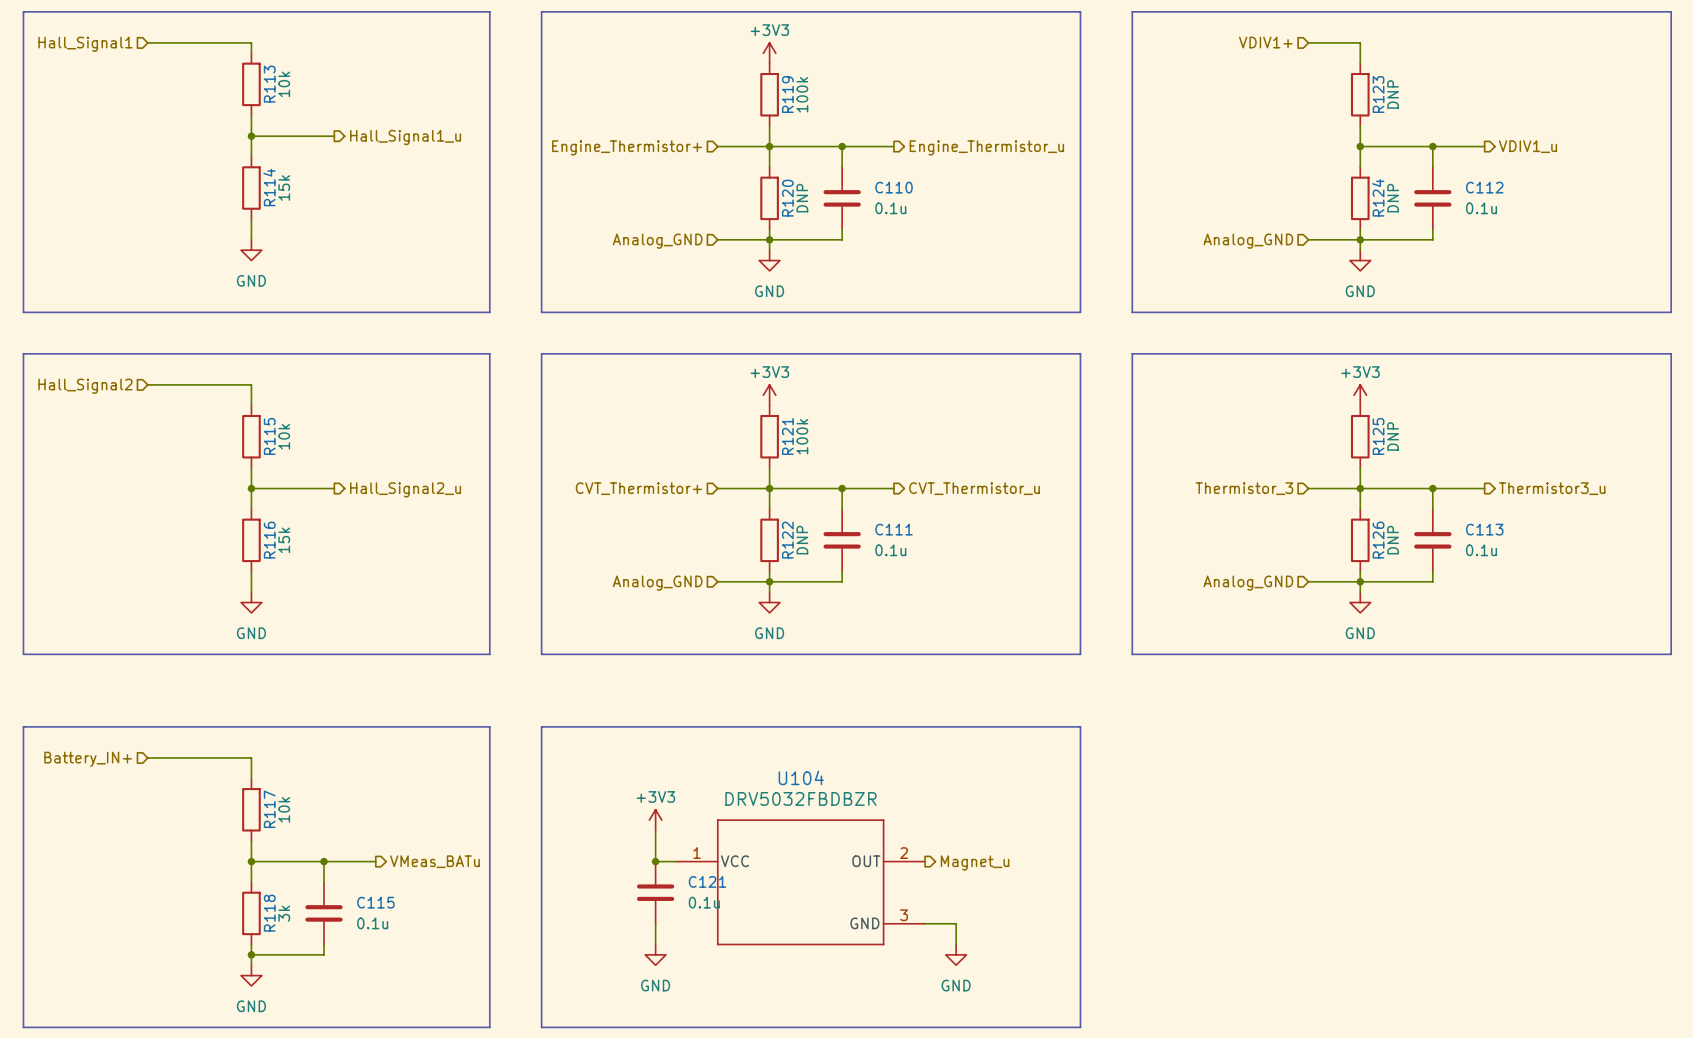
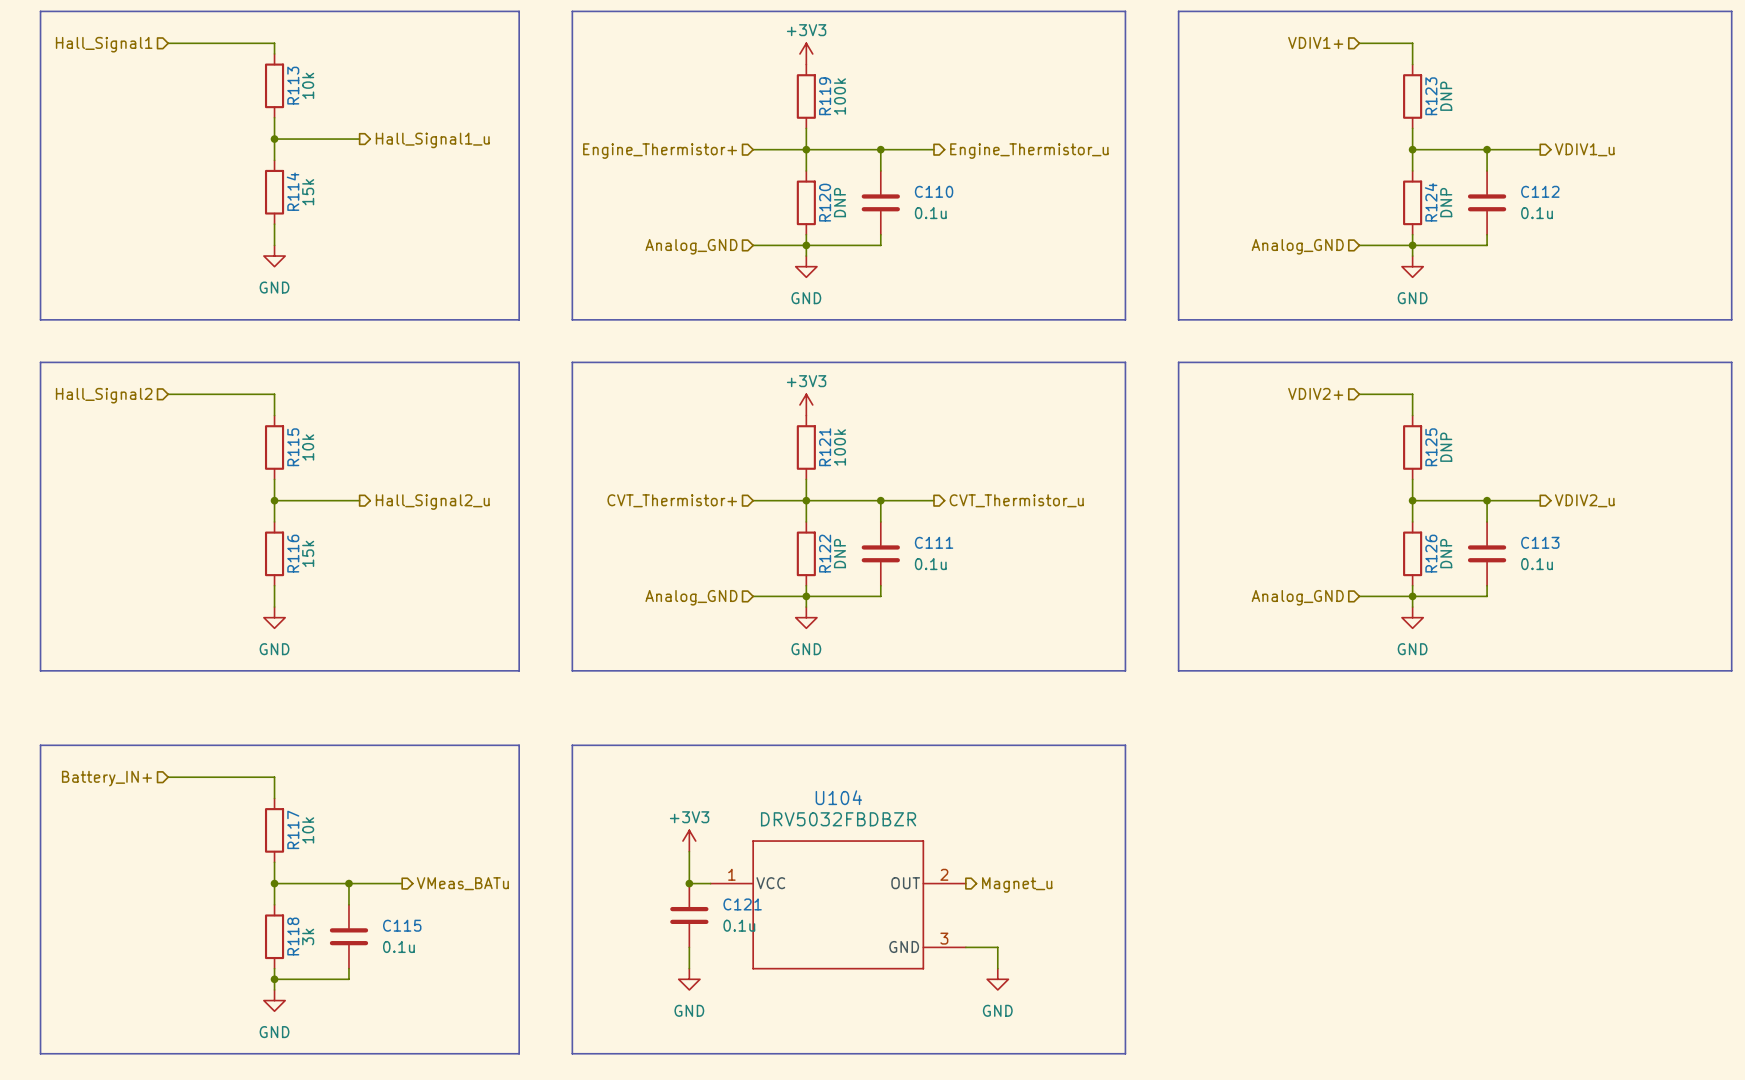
hierarchical label: none -> VDIV2+ (1315, 393)
wire: none -> (1359, 394) (1412, 394) (1412, 415)
power symbol: +3V3 (1360, 395) -> none
hierarchical label: Thermistor_3 (1244, 488) -> none
wire: (1308, 488) (1360, 488) -> none
hierarchical label: Thermistor3_u (1552, 488) -> VDIV2_u (1584, 500)

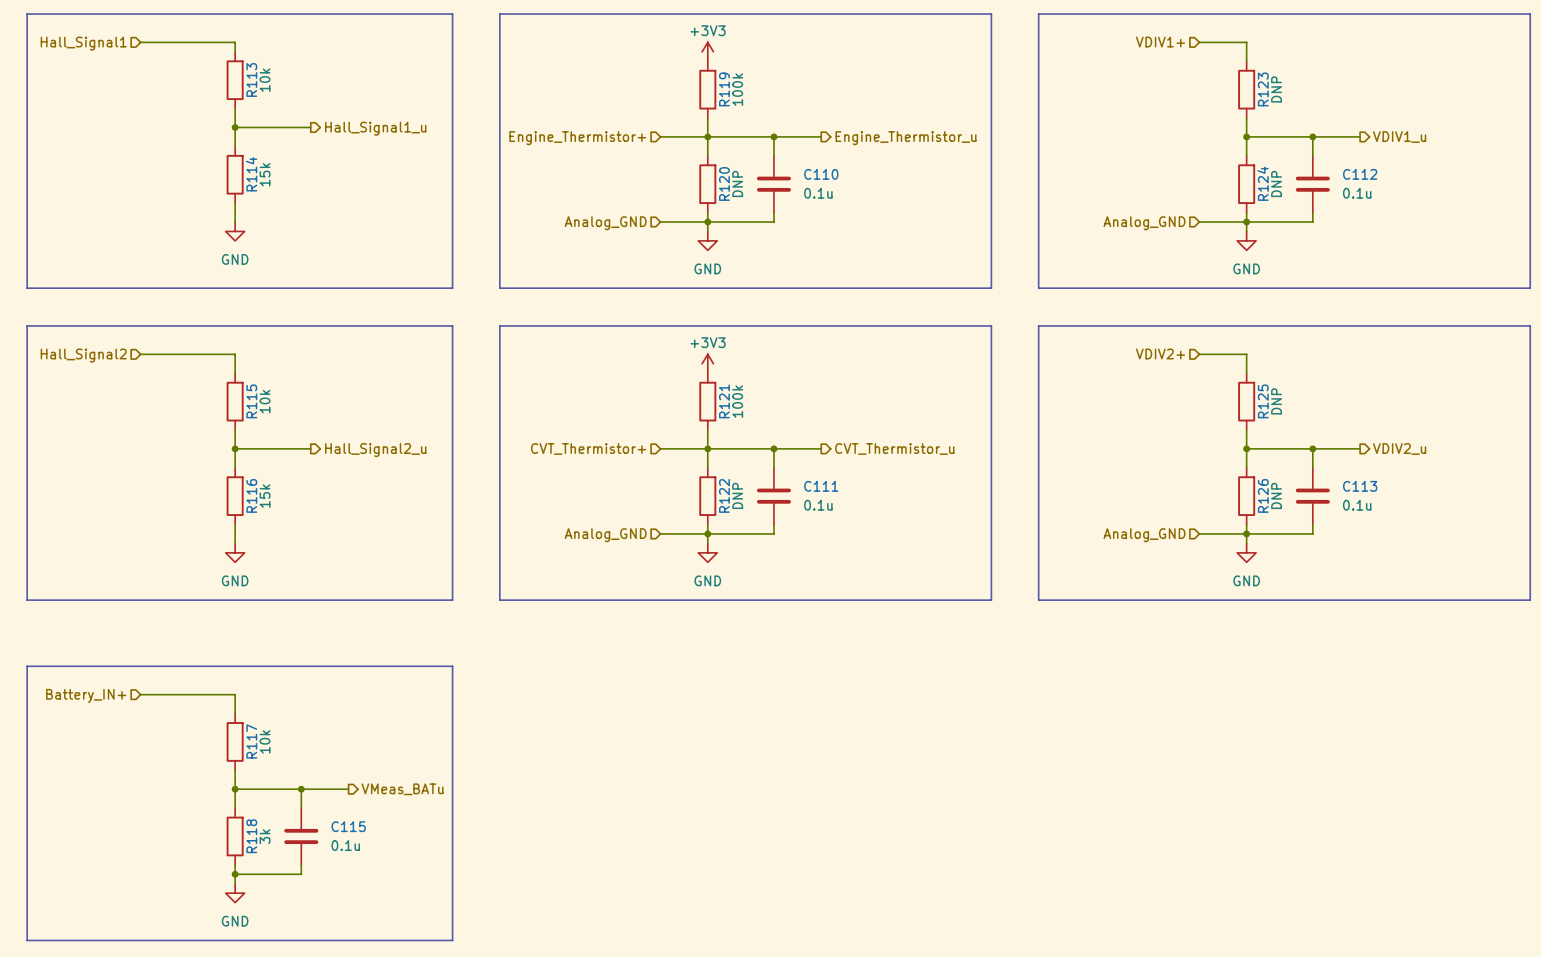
line: (572, 745) (1125, 745) (1125, 1053) (572, 1053) (572, 745) -> none
power symbol: +3V3 (689, 841) -> none
wire: (689, 851) (689, 883) (710, 883) -> none
junction: (689, 883) -> none
hierarchical label: Magnet_u (1017, 884) -> none
U104: DRV5032FBDBZR (838, 904) -> none
C121: 0.1u (689, 915) -> none
wire: (689, 947) (689, 968) -> none
wire: (965, 947) (997, 947) (997, 968) -> none
power symbol: GND (689, 979) -> none
power symbol: GND (997, 979) -> none

